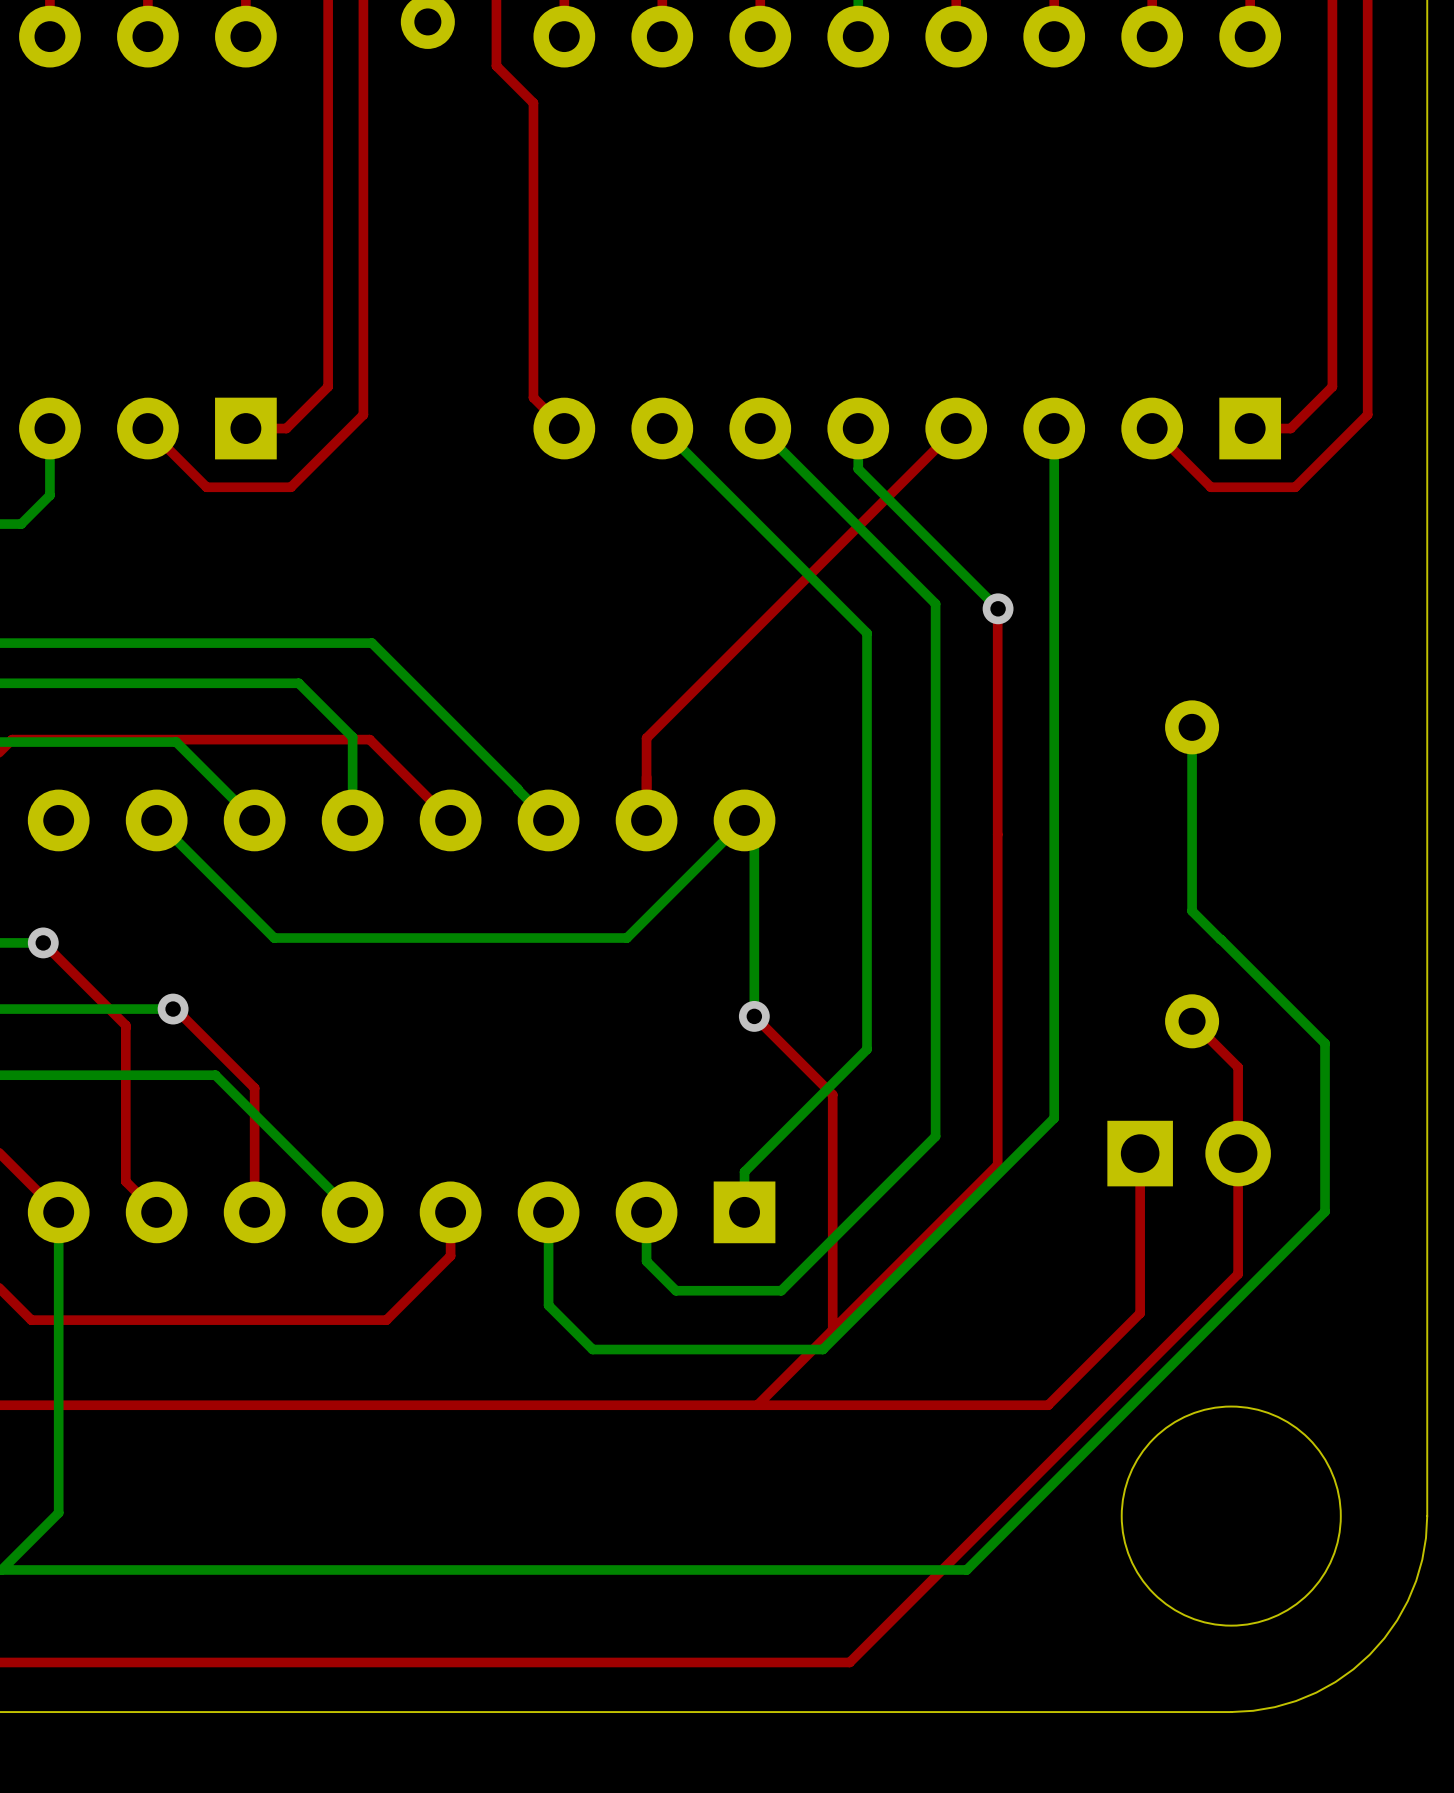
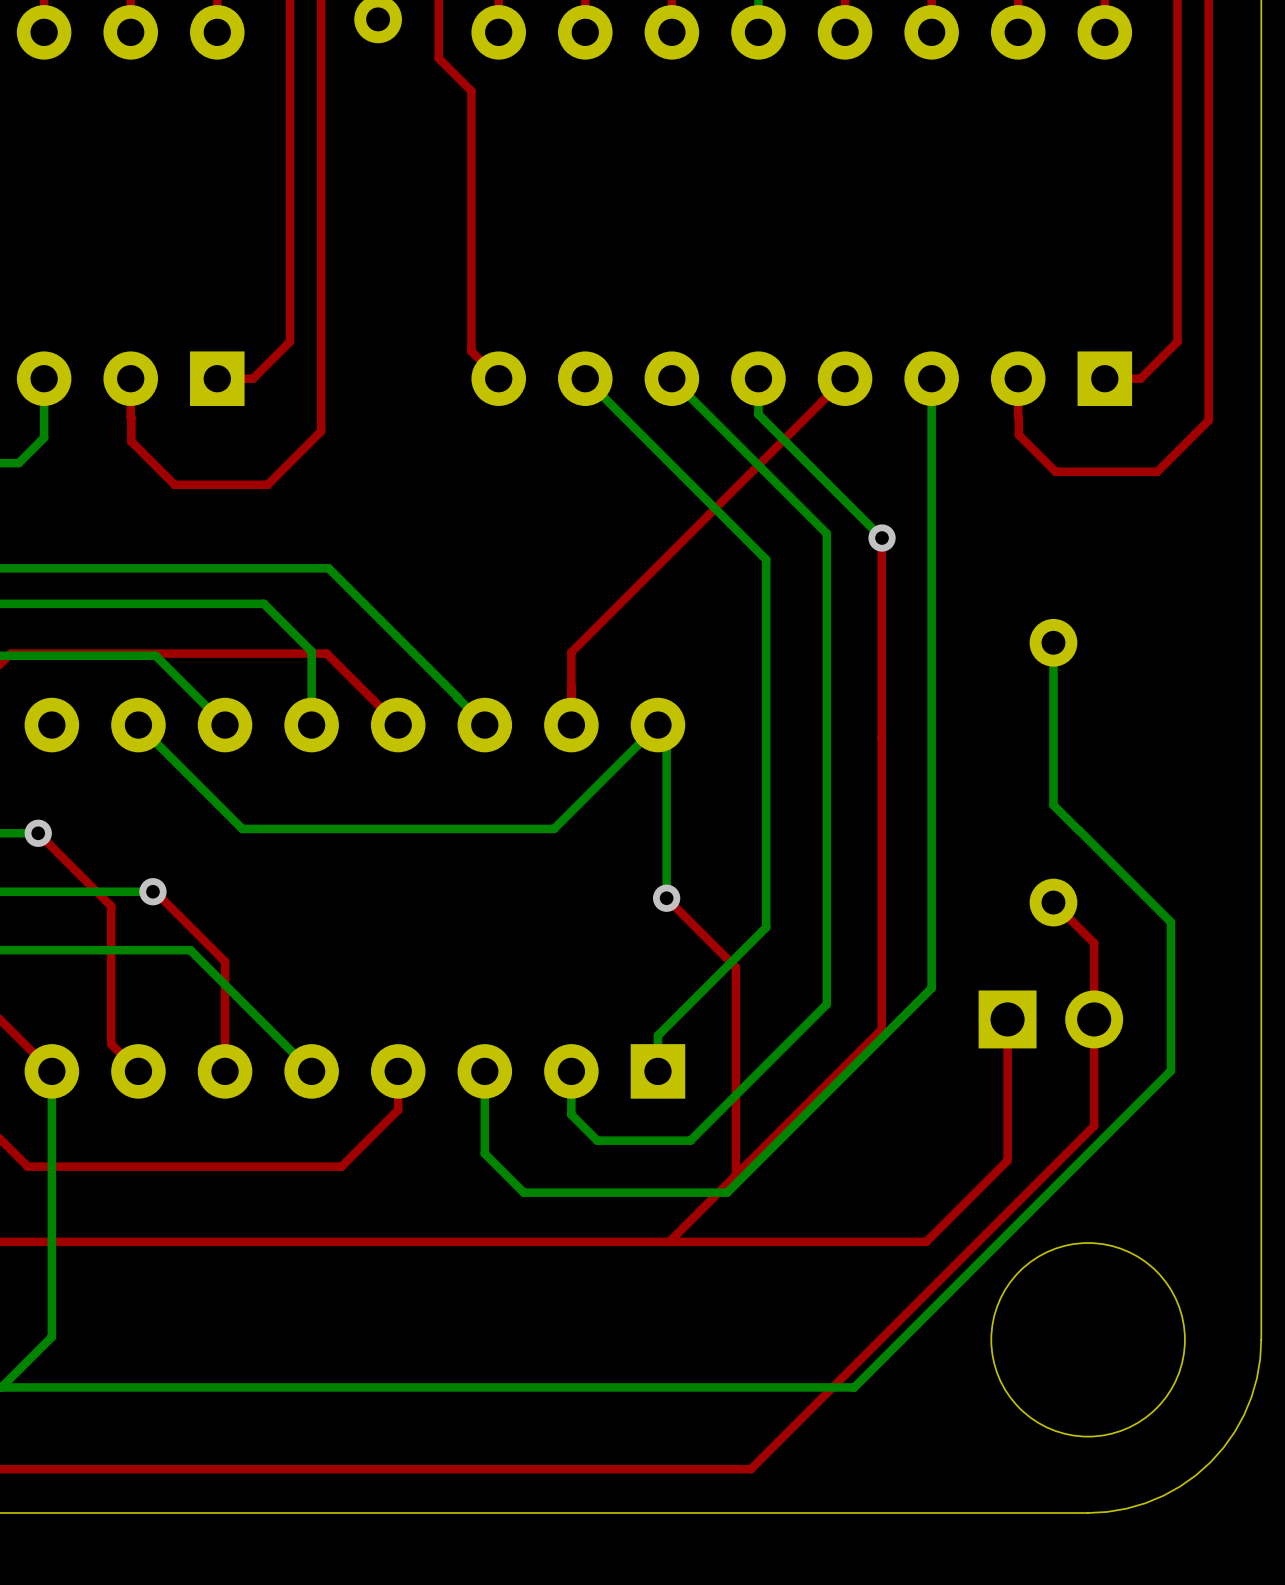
top track: (363, 414) (290, 487) (206, 487) (147, 428) -> (321, 366) (321, 431) (267, 484) (174, 484) (131, 441) (130, 378)
top track: (1367, 414) (1295, 487) (1210, 487) (1152, 428) -> (1208, 366) (1208, 420) (1157, 471) (1055, 471) (1018, 434) (1018, 378)

